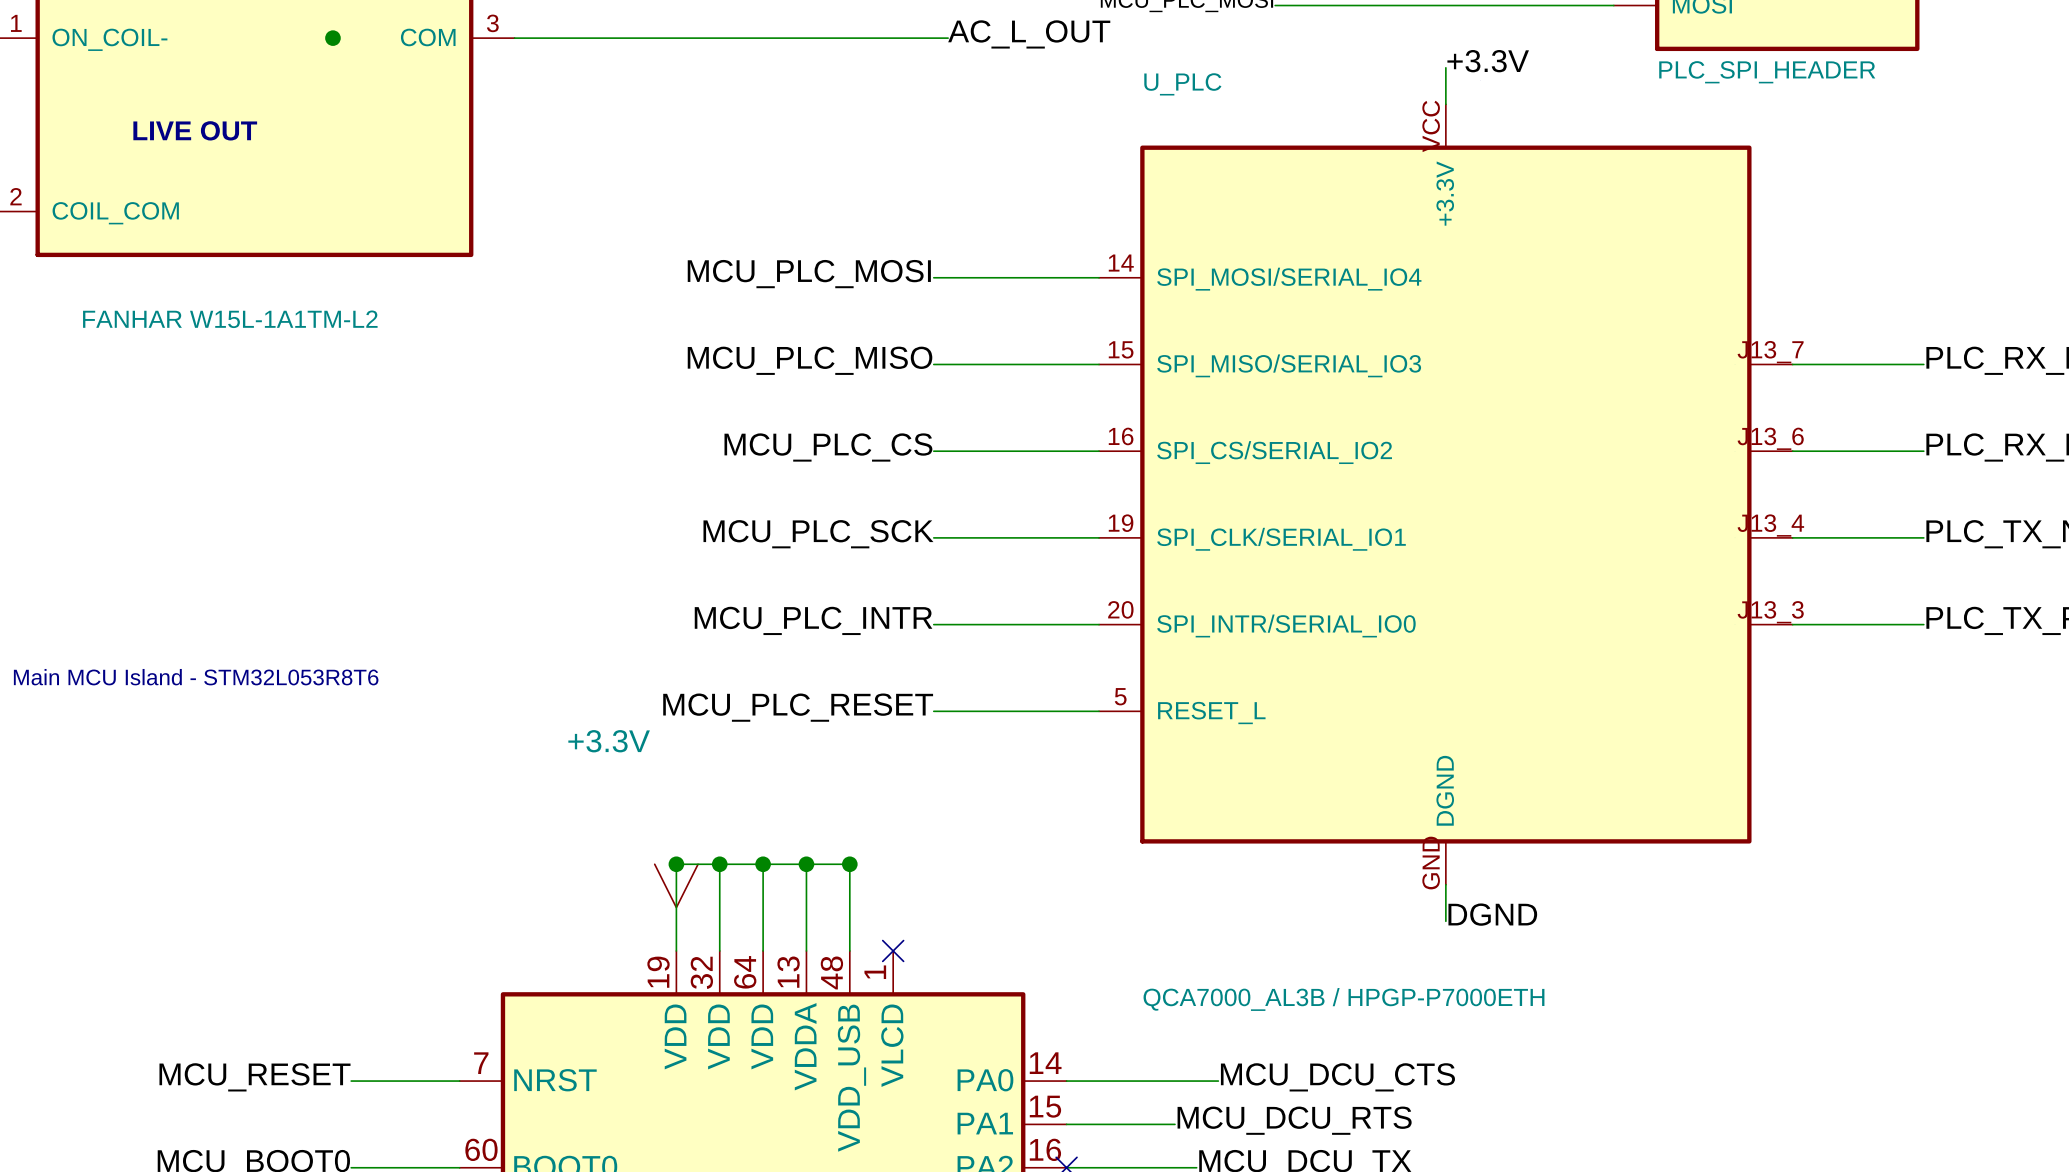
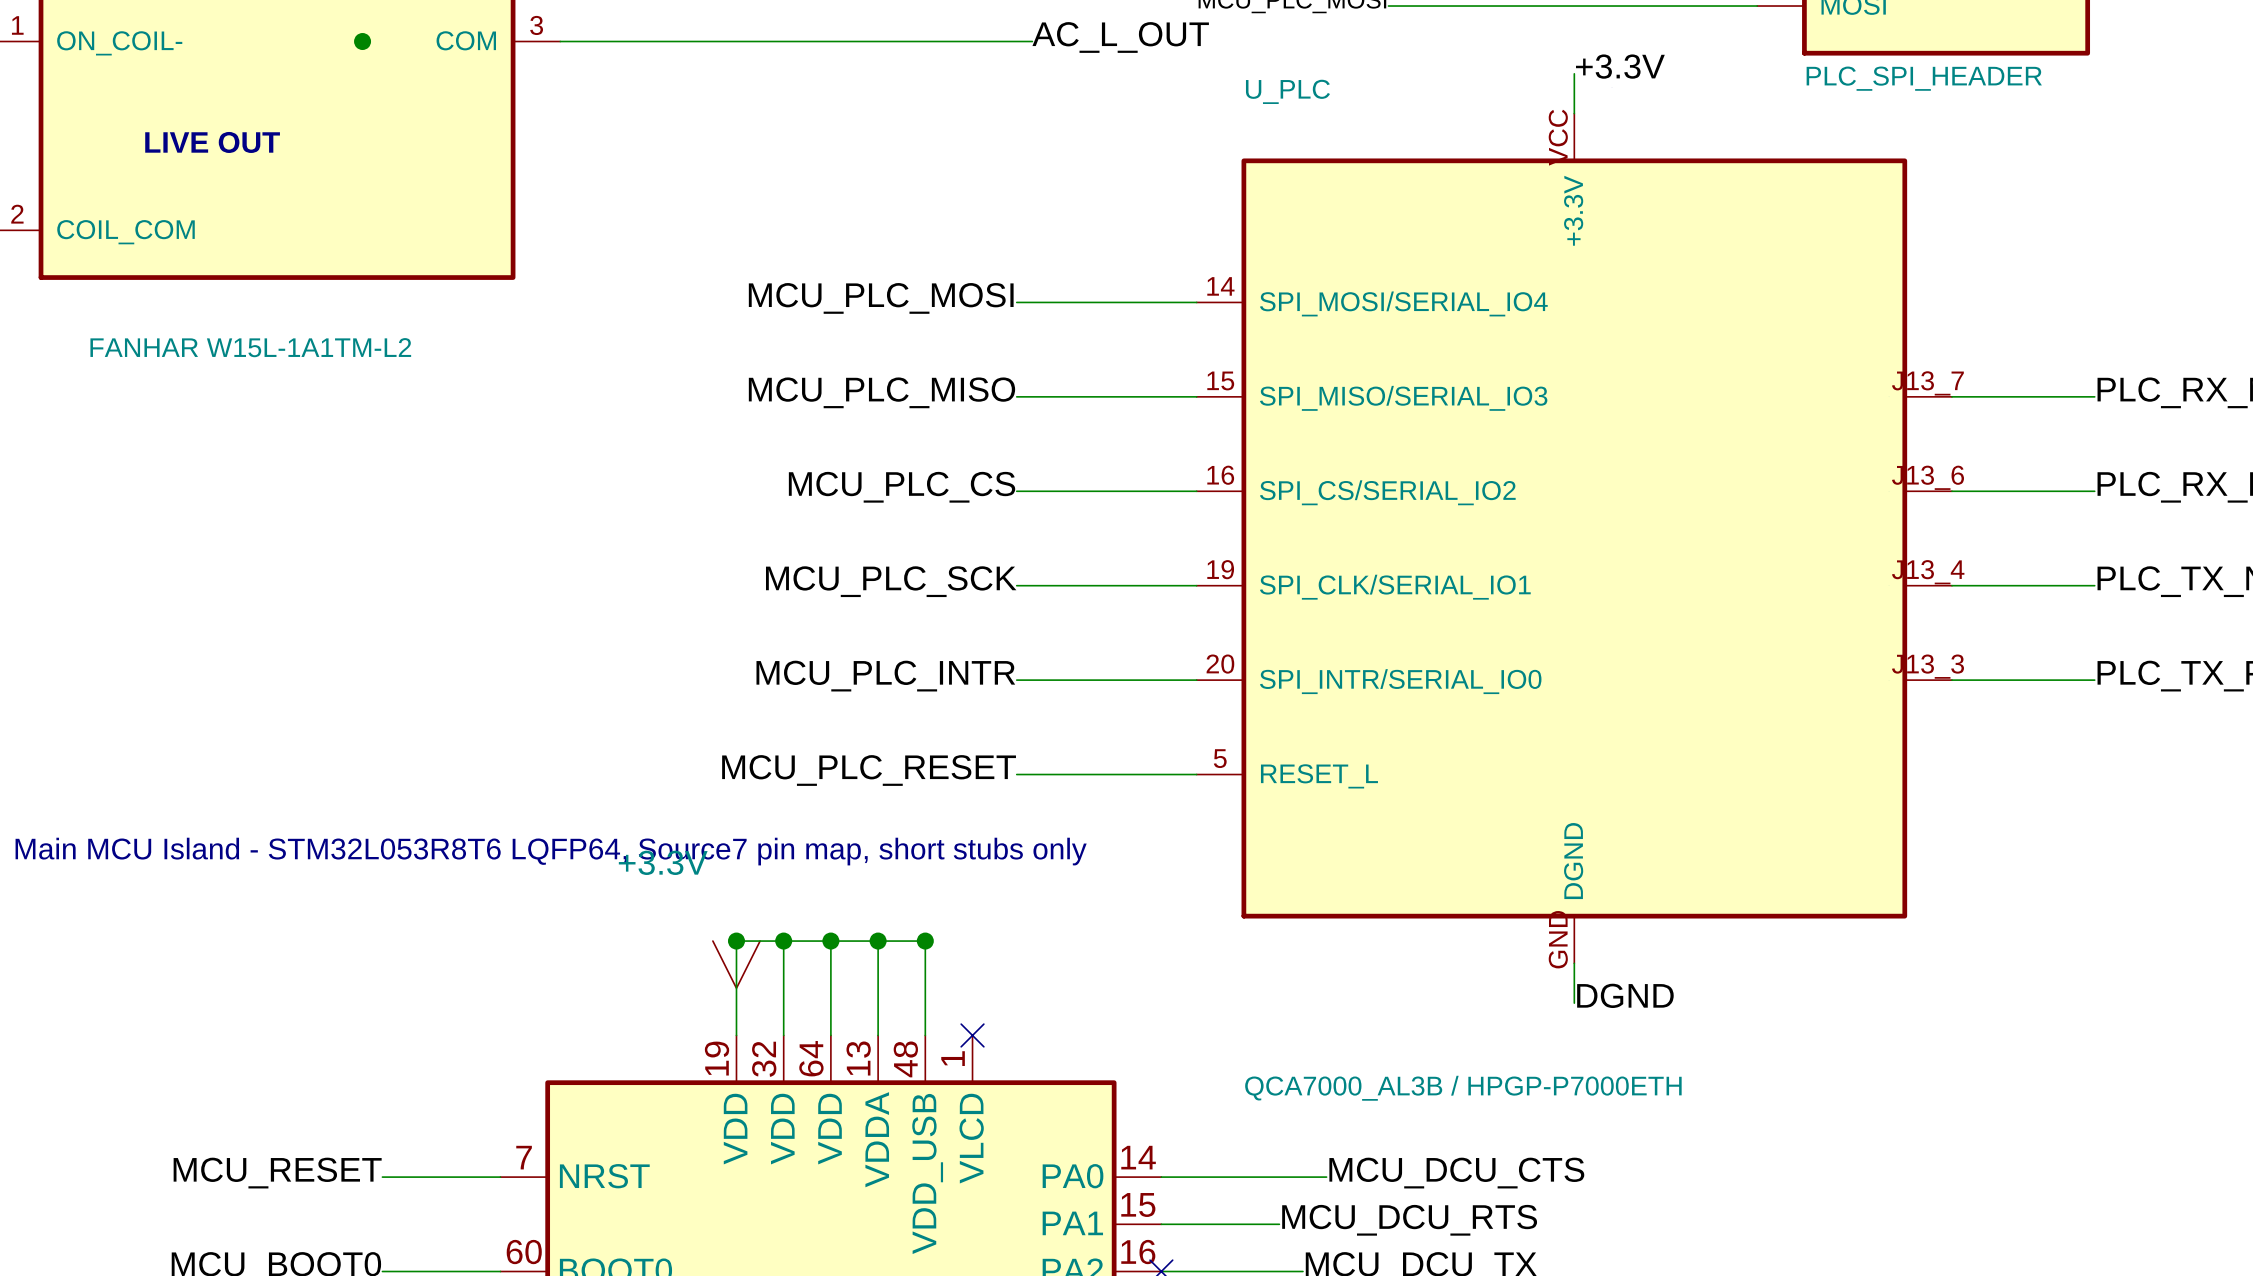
text: Main MCU Island - STM32L053R8T6 (196, 677) -> none
power symbol text position: +3.3V (609, 741) -> +3.3V (663, 862)
text: none -> Main MCU Island - STM32L053R8T6 LQFP64, Source7 pin map, short stubs only (551, 851)

